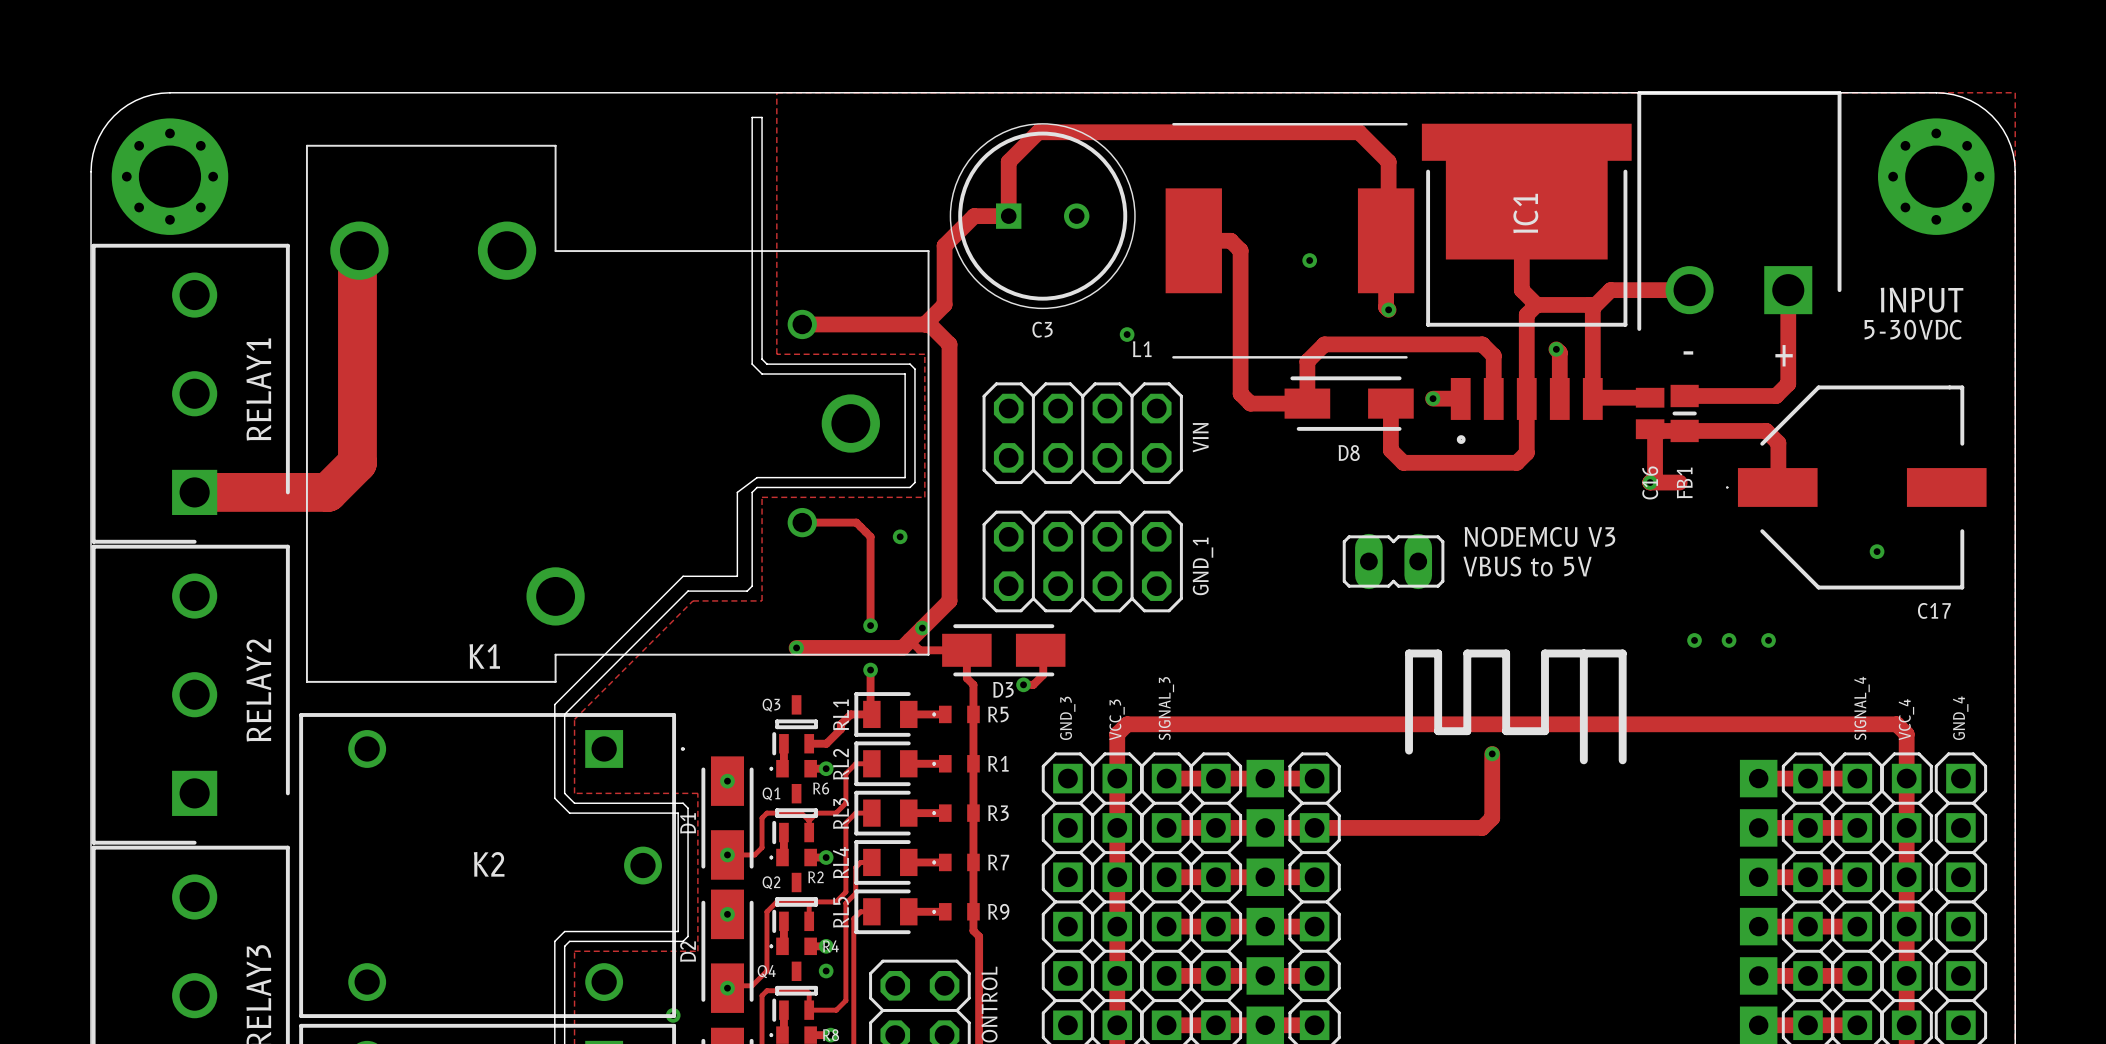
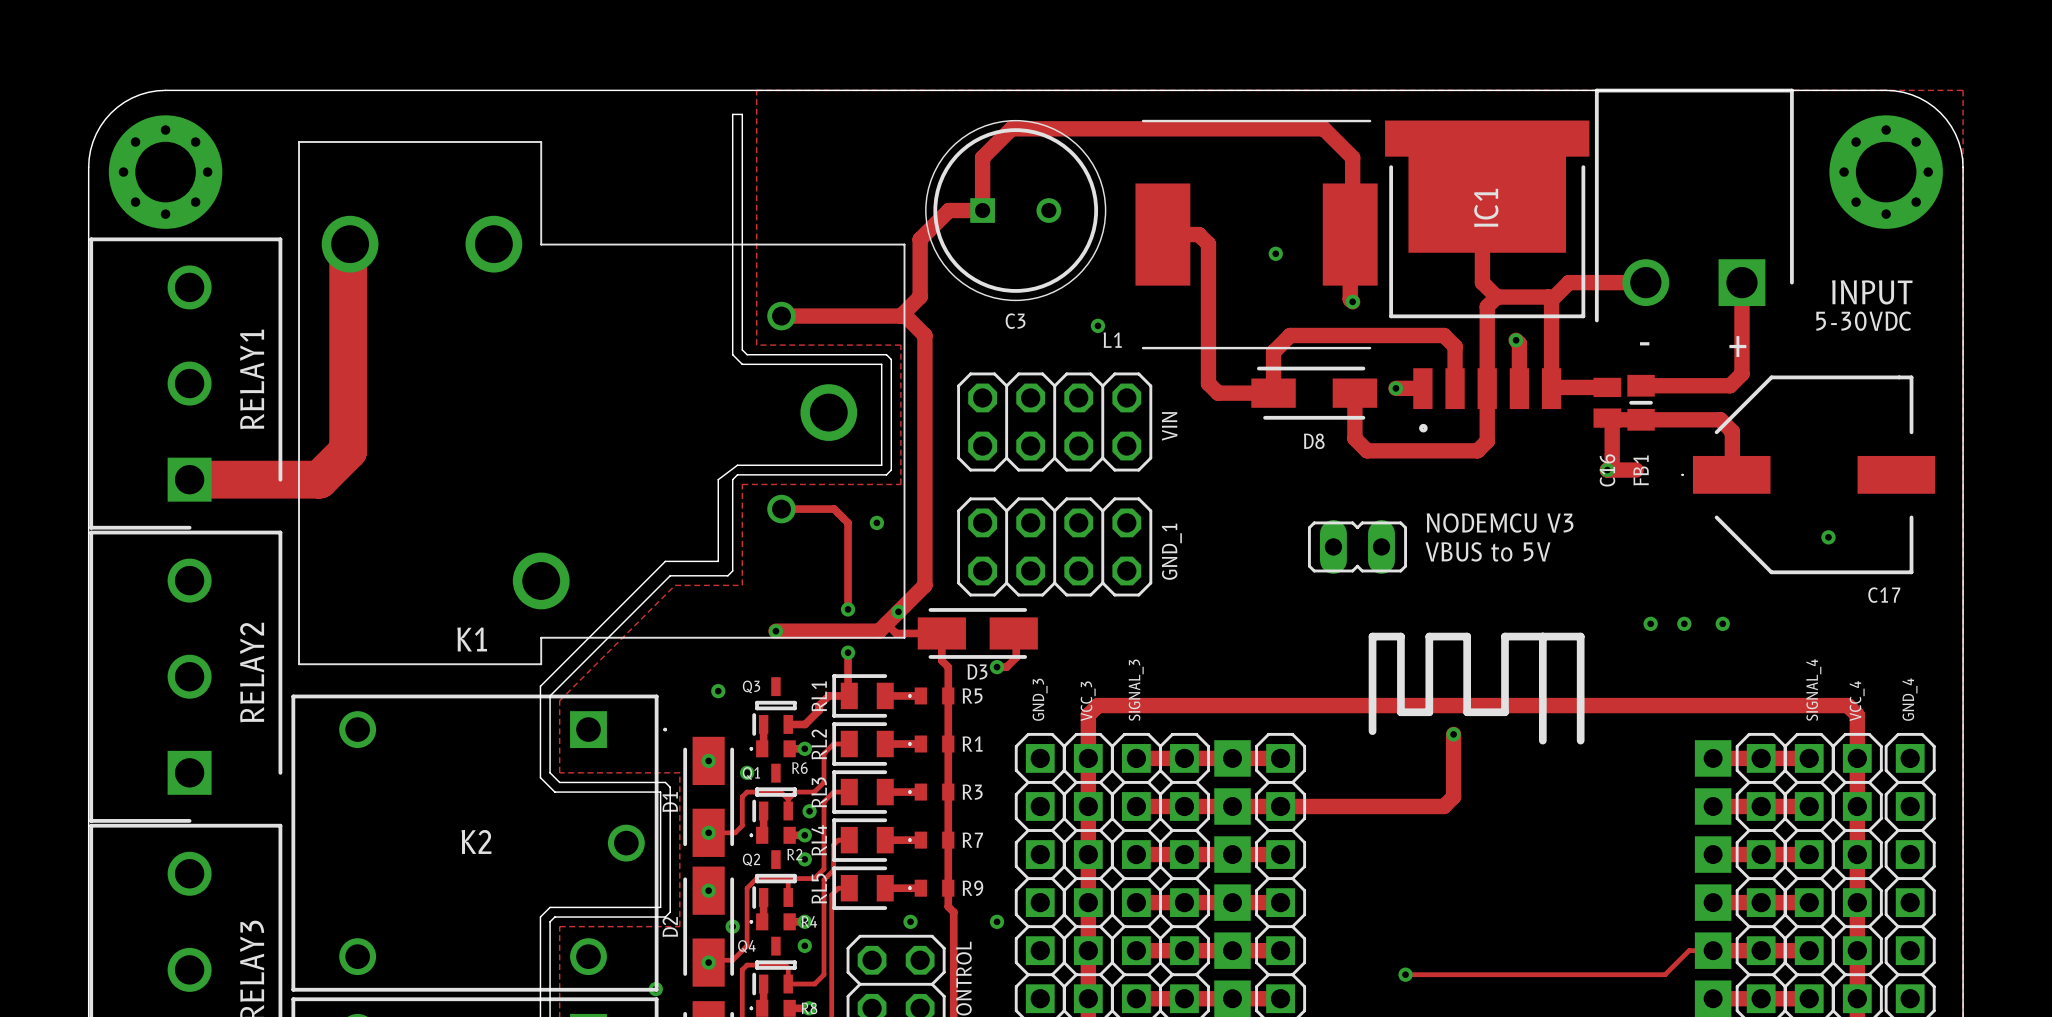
via: none -> (718, 691)
via: none -> (747, 772)
via: none -> (809, 811)
via: none -> (804, 859)
via: none -> (910, 921)
via: none -> (997, 921)
via: none -> (732, 926)
track: none -> (1713, 950) (1689, 950) (1665, 974) (1405, 974)
via: none -> (1405, 974)

